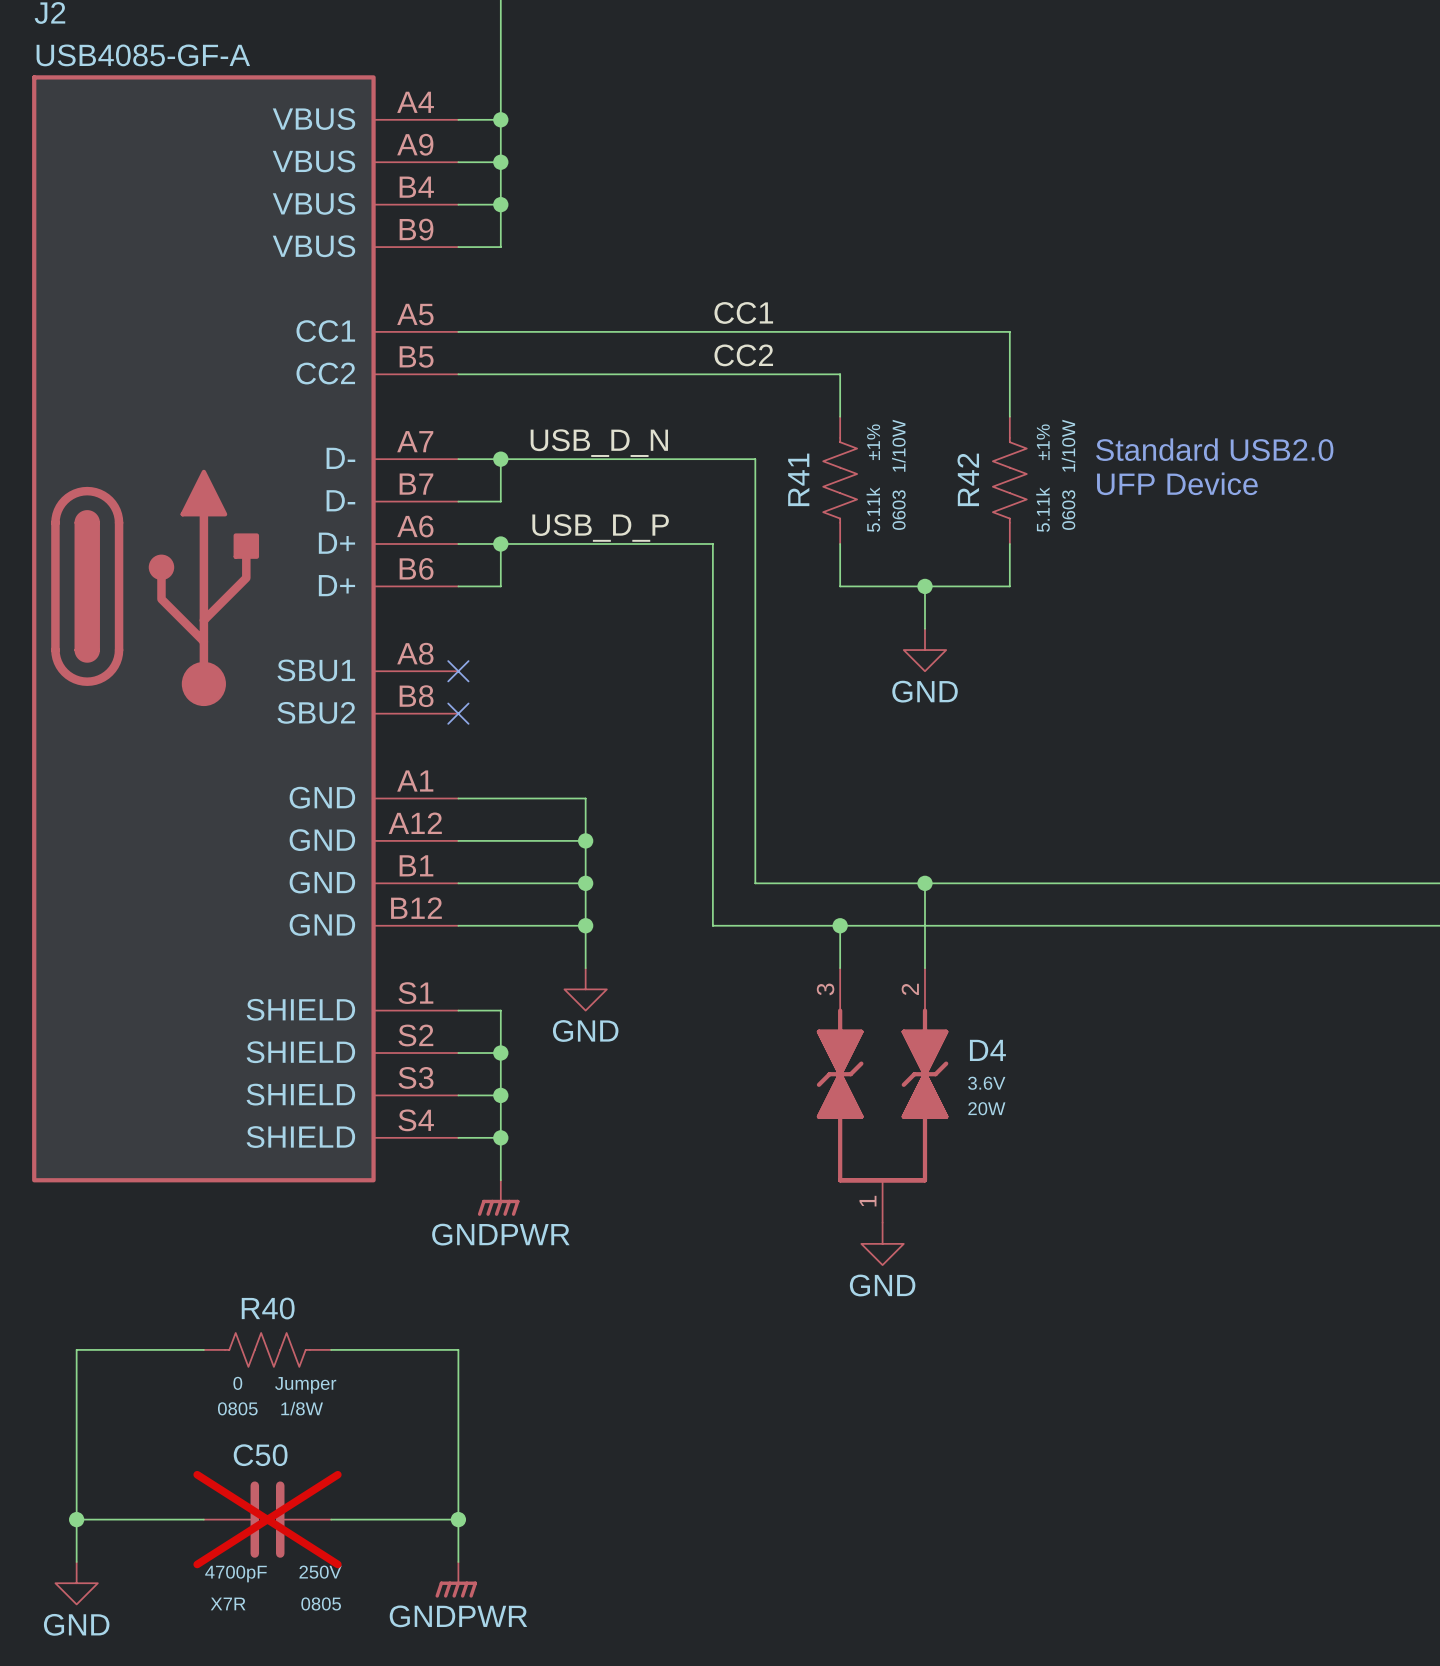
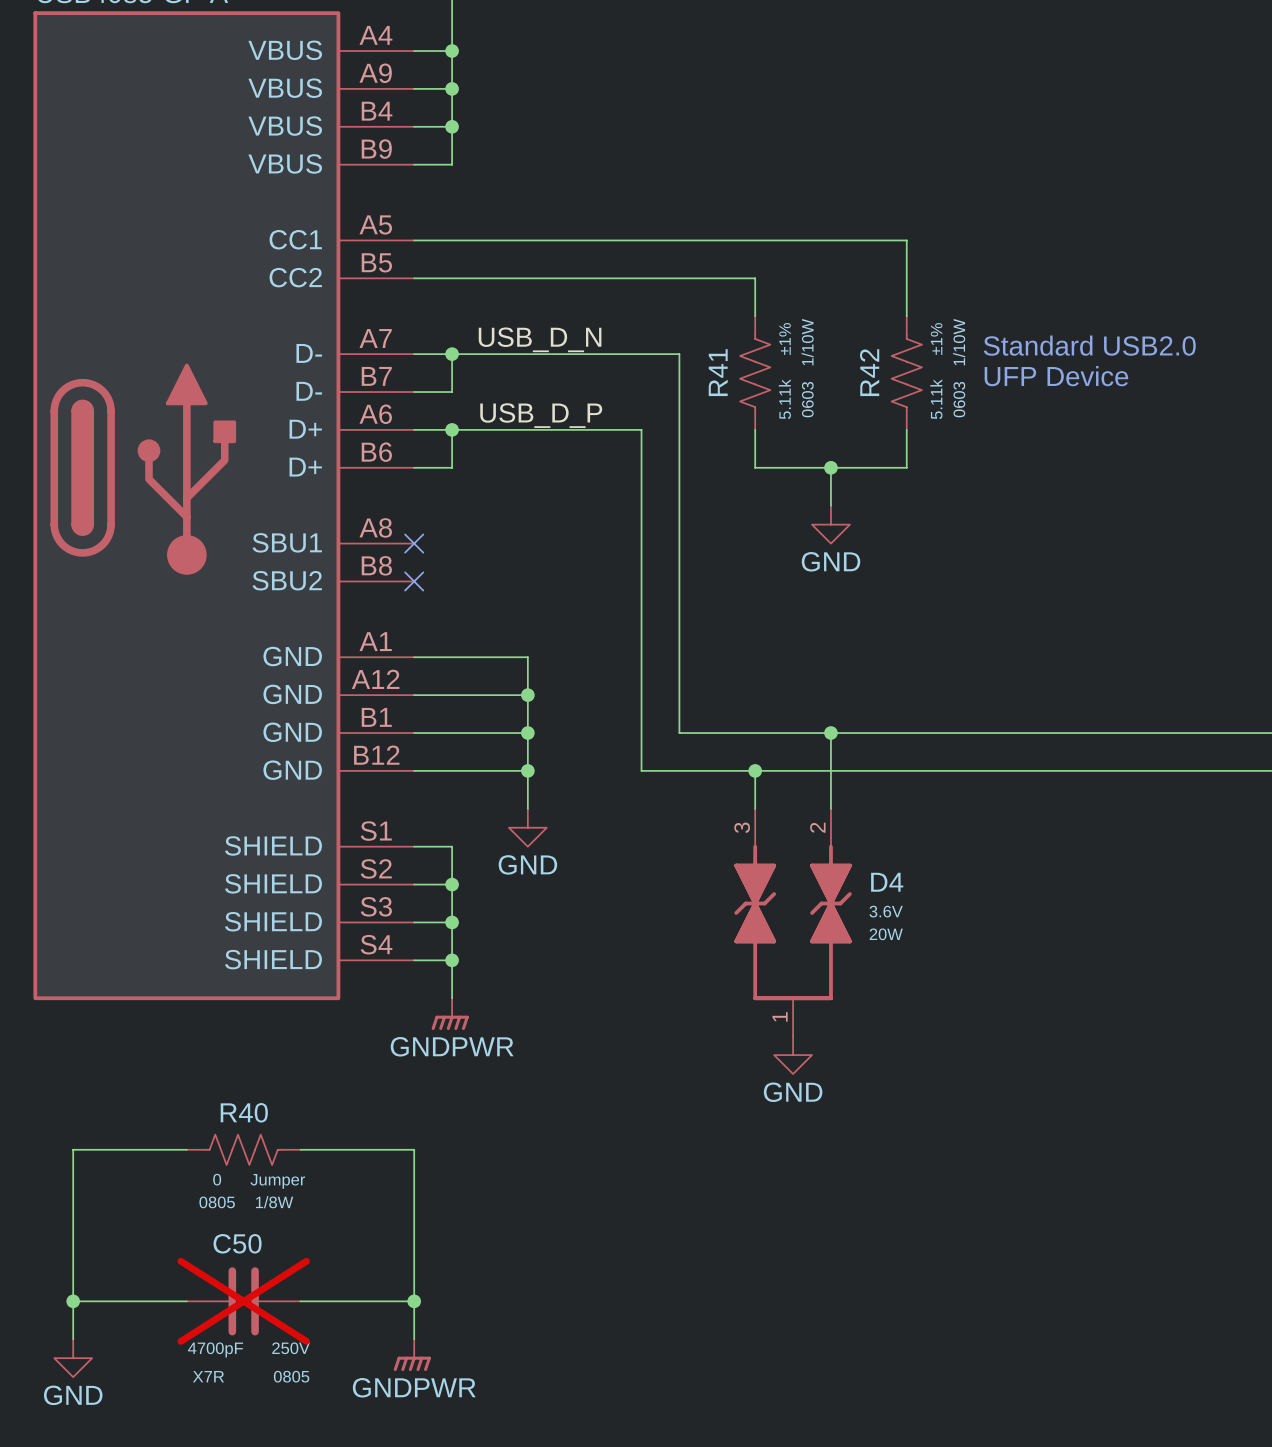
label: CC1 (743, 312) -> none
label: CC2 (743, 355) -> none

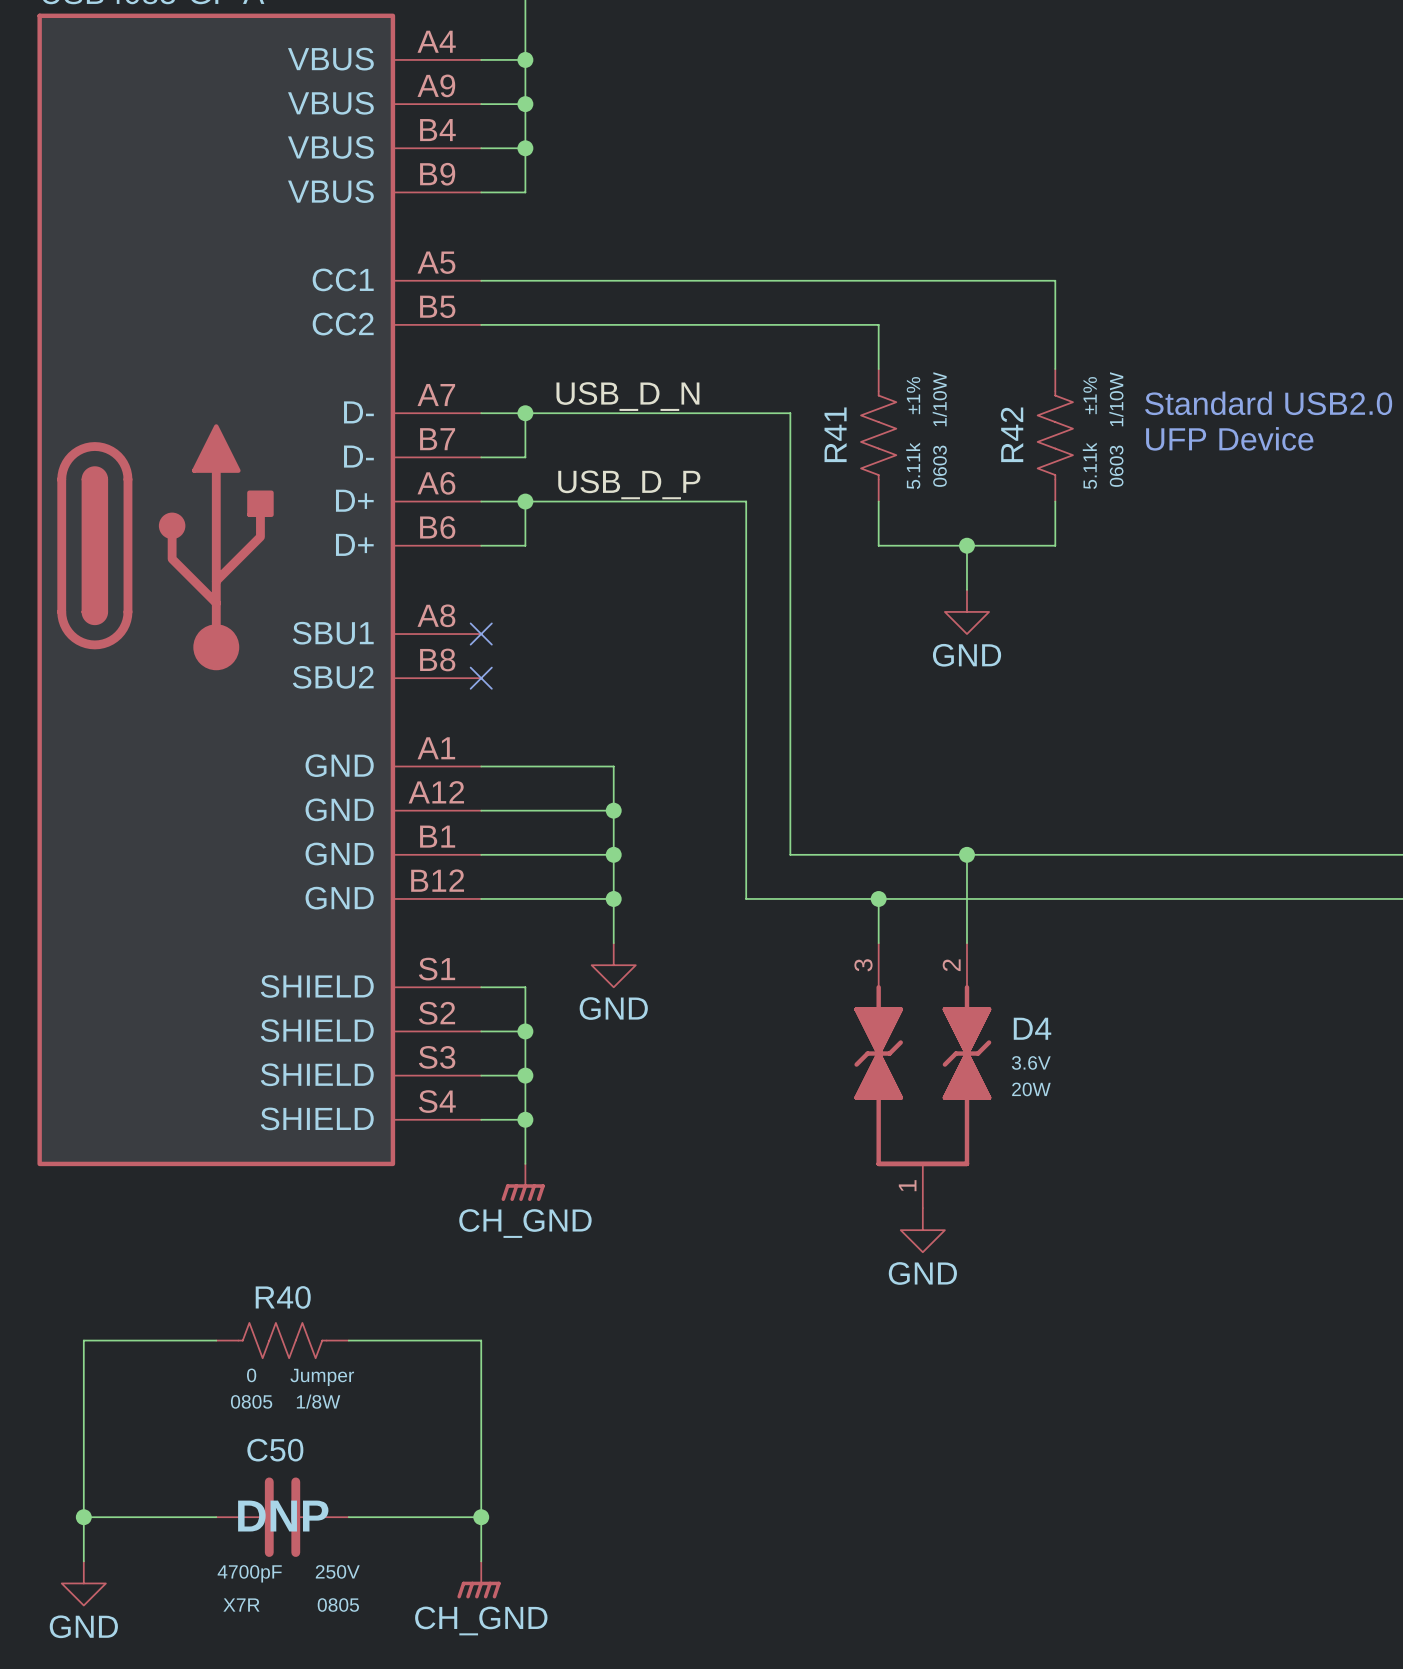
power symbol: GNDPWR (450, 1014) -> CH_GND (523, 1182)
C50 text: none -> DNP (283, 1516)
C50 do-not-place cross: (243, 1301) -> none
power symbol: GNDPWR (412, 1355) -> CH_GND (479, 1579)

